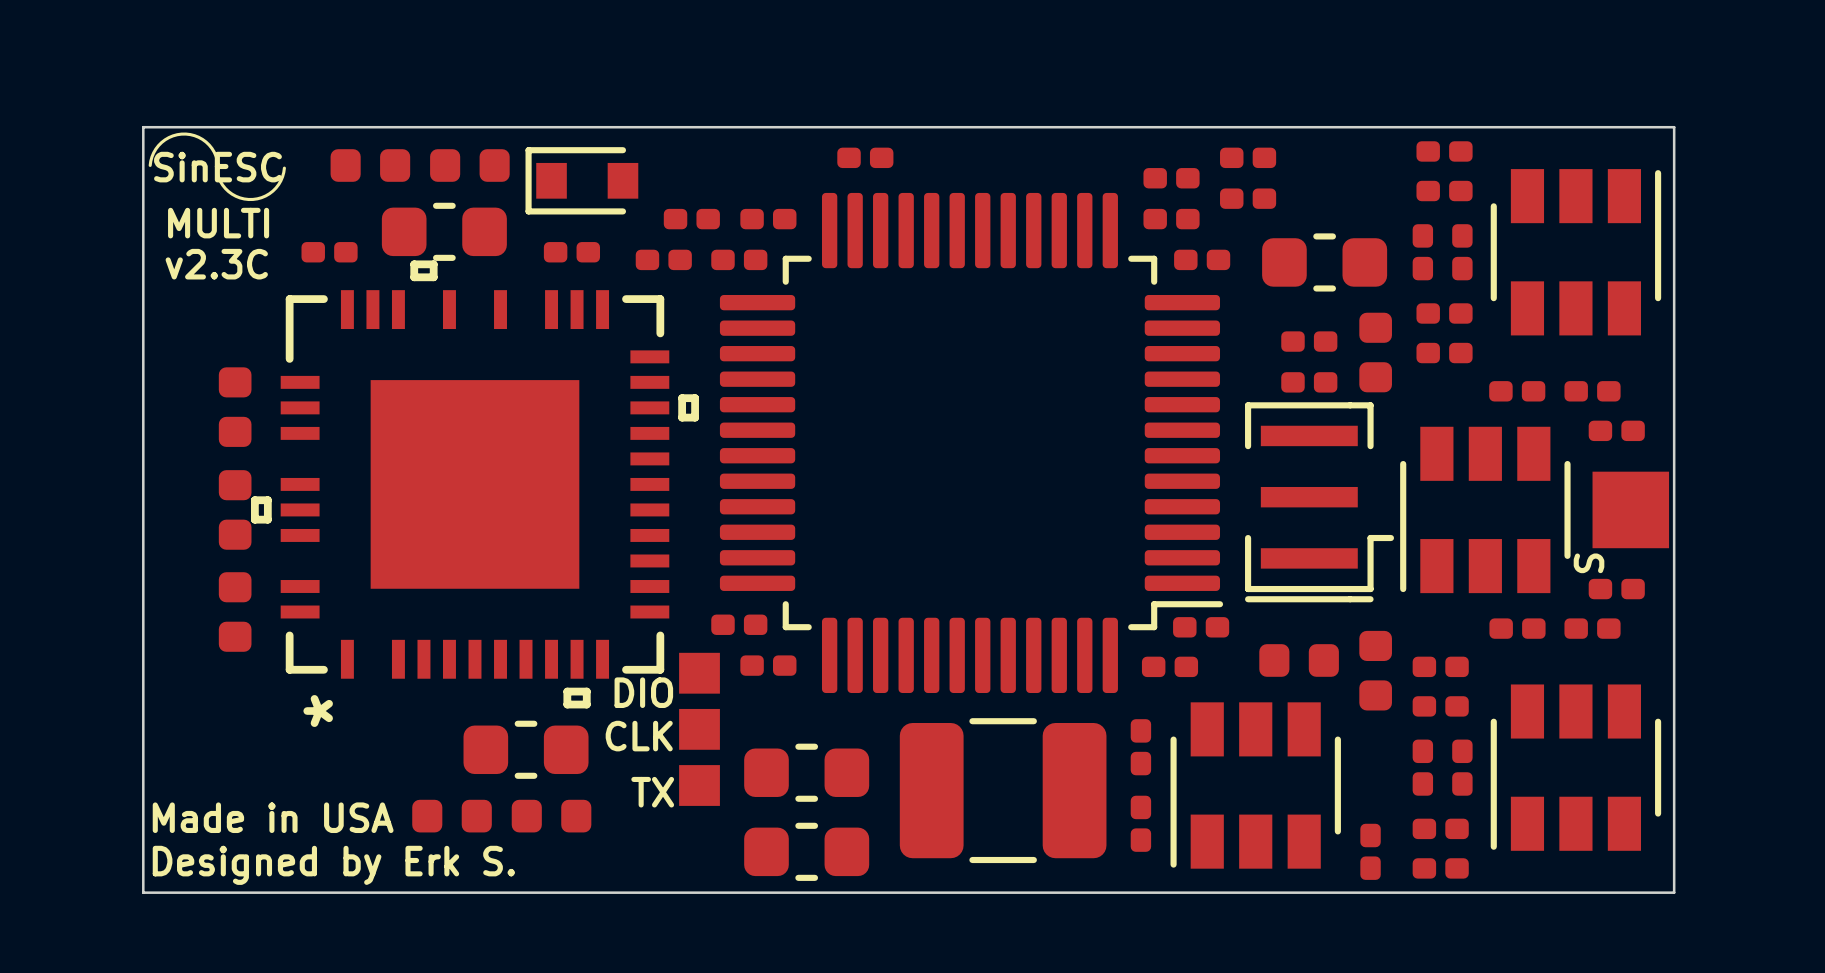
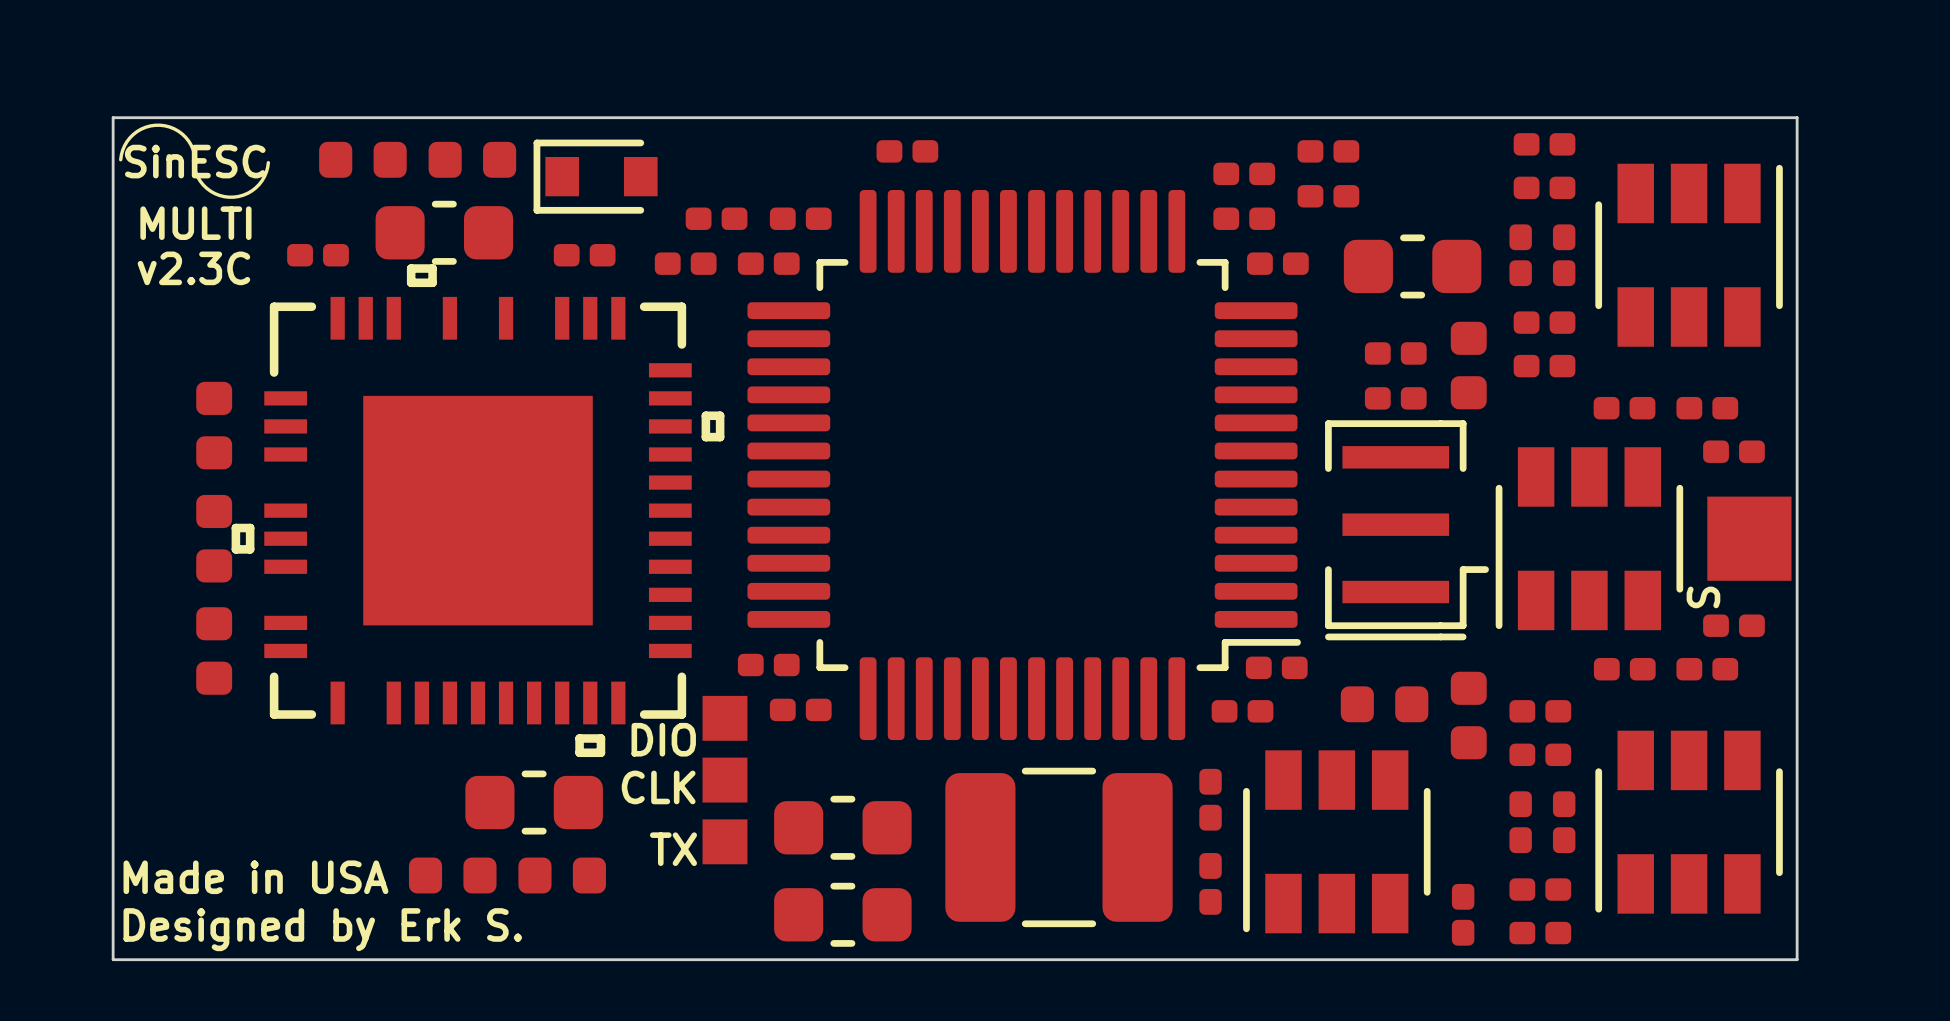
part text: * (318, 711) -> none

